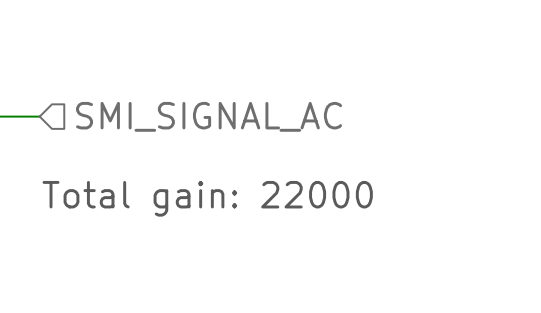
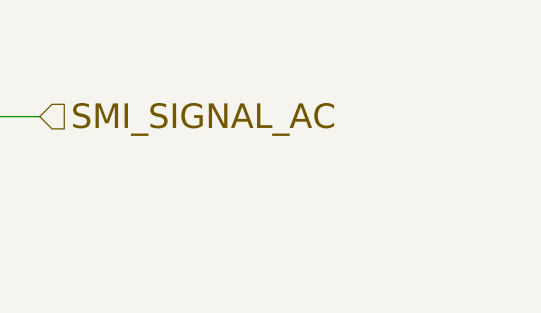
text: Total gain: 22000 (207, 198) -> none

